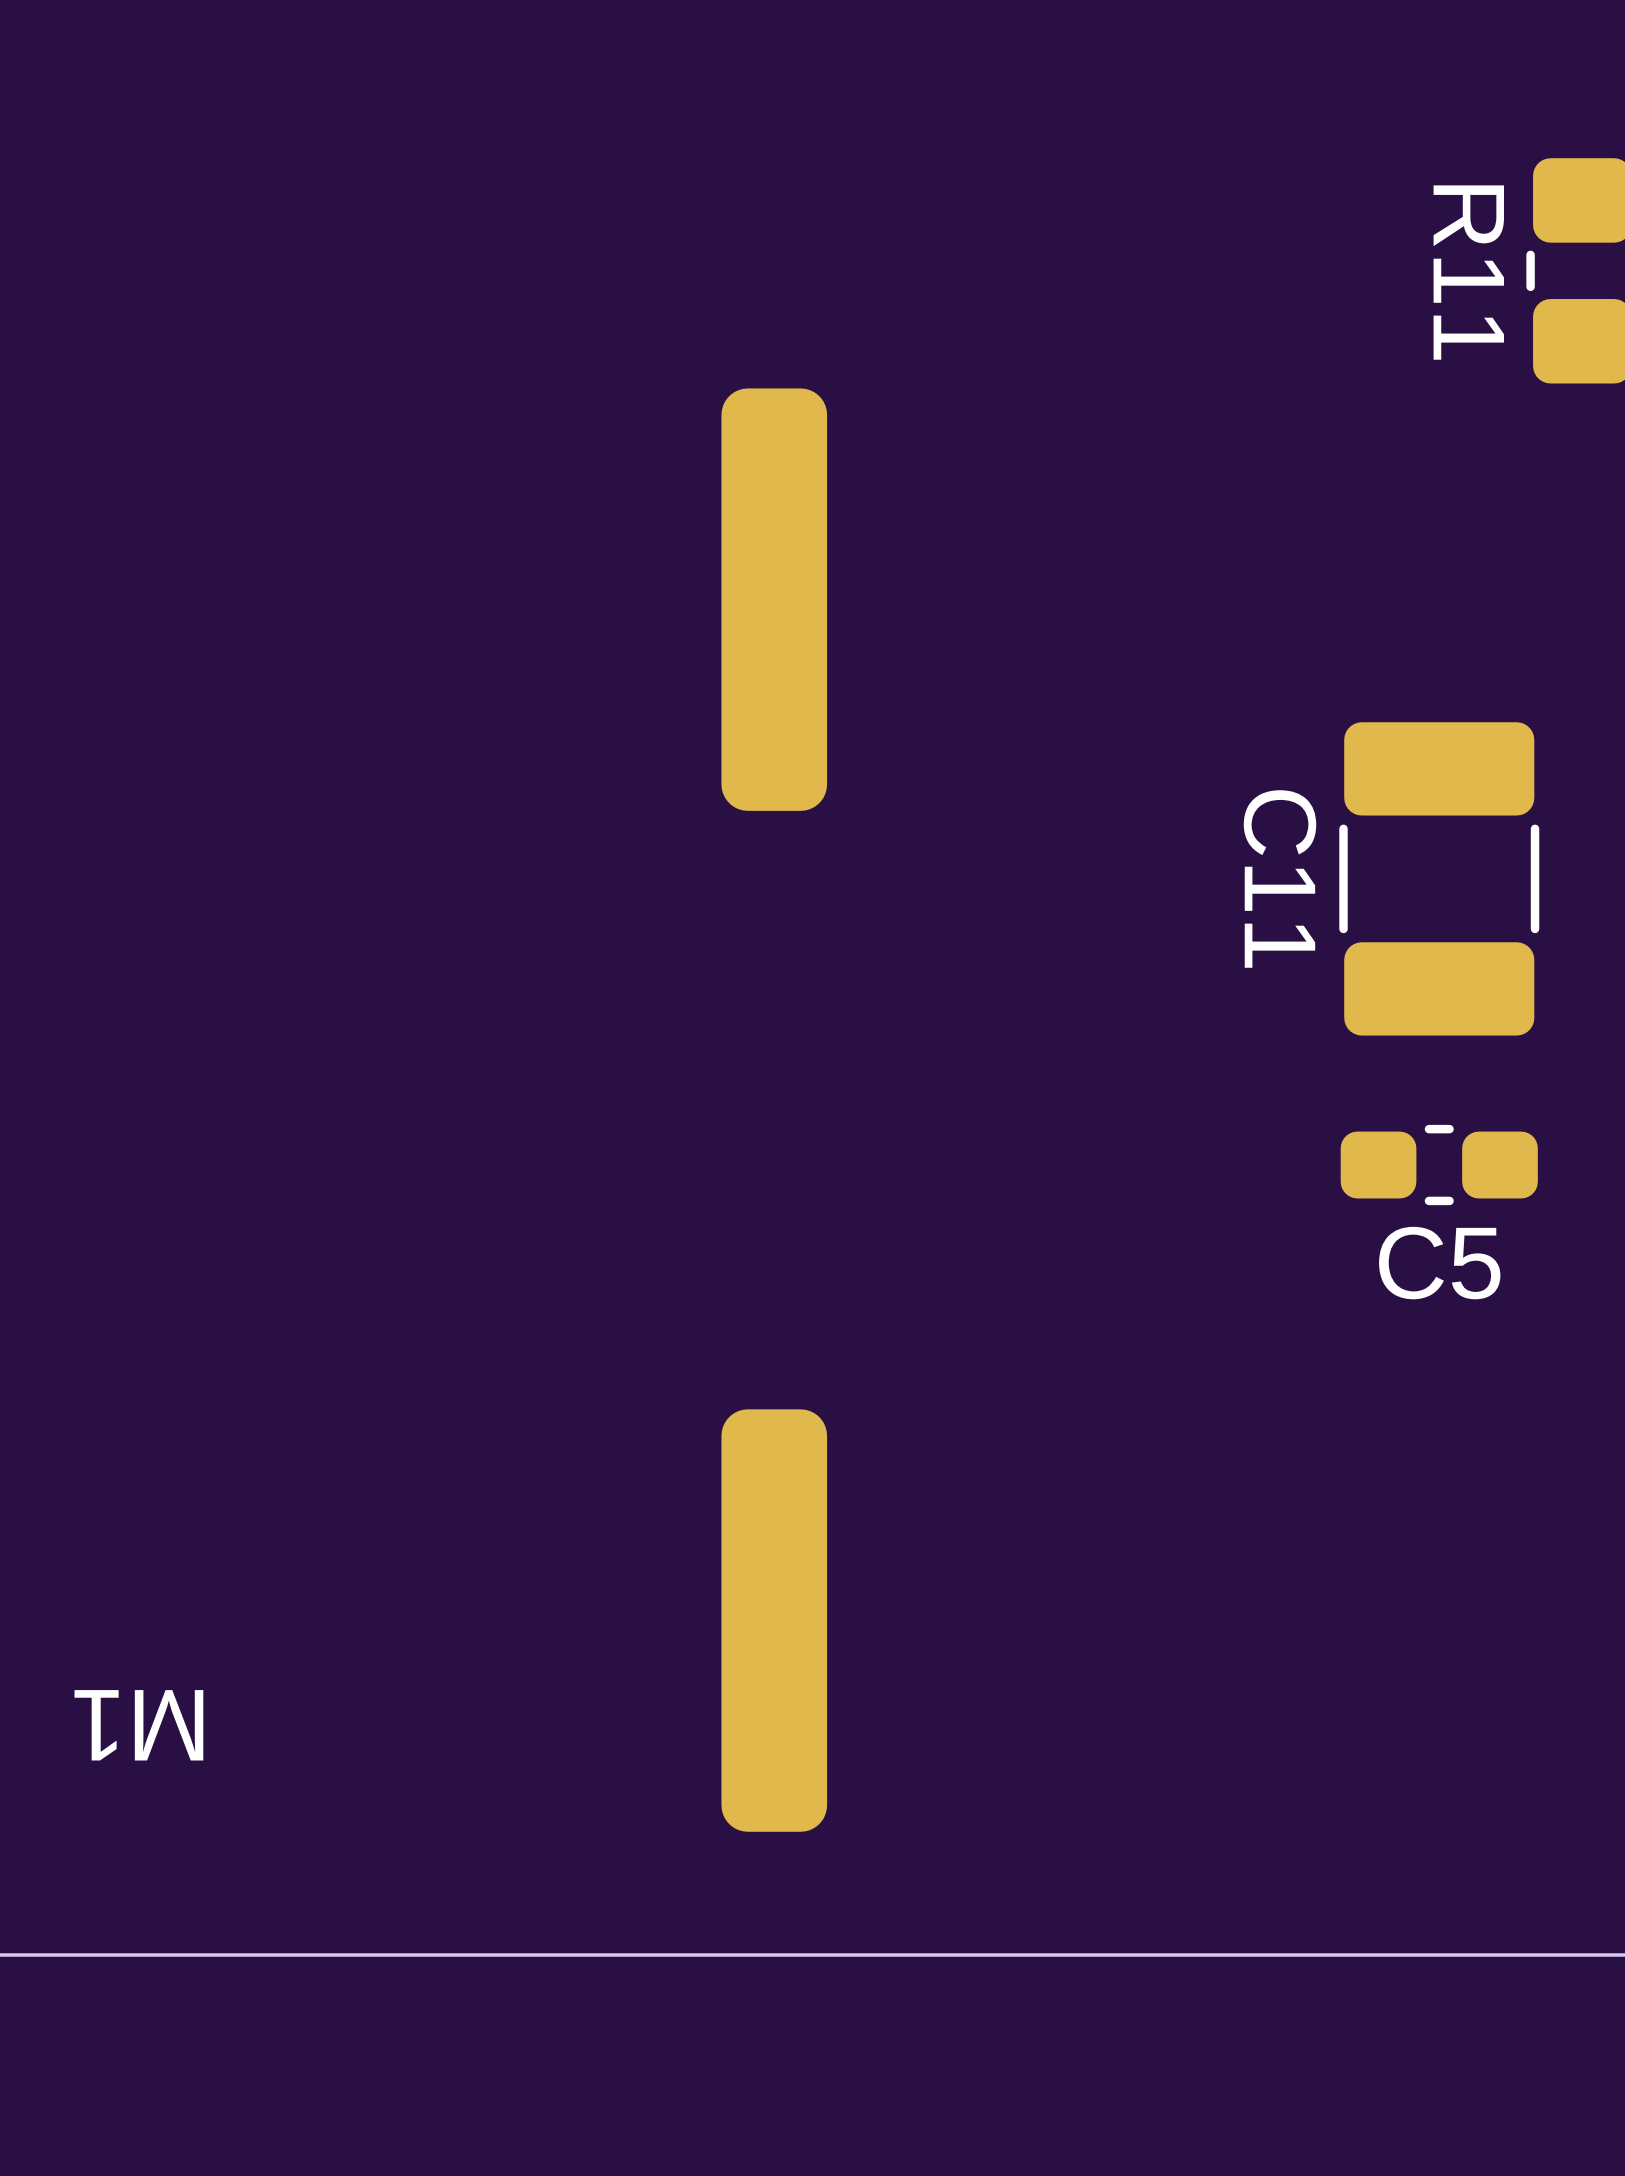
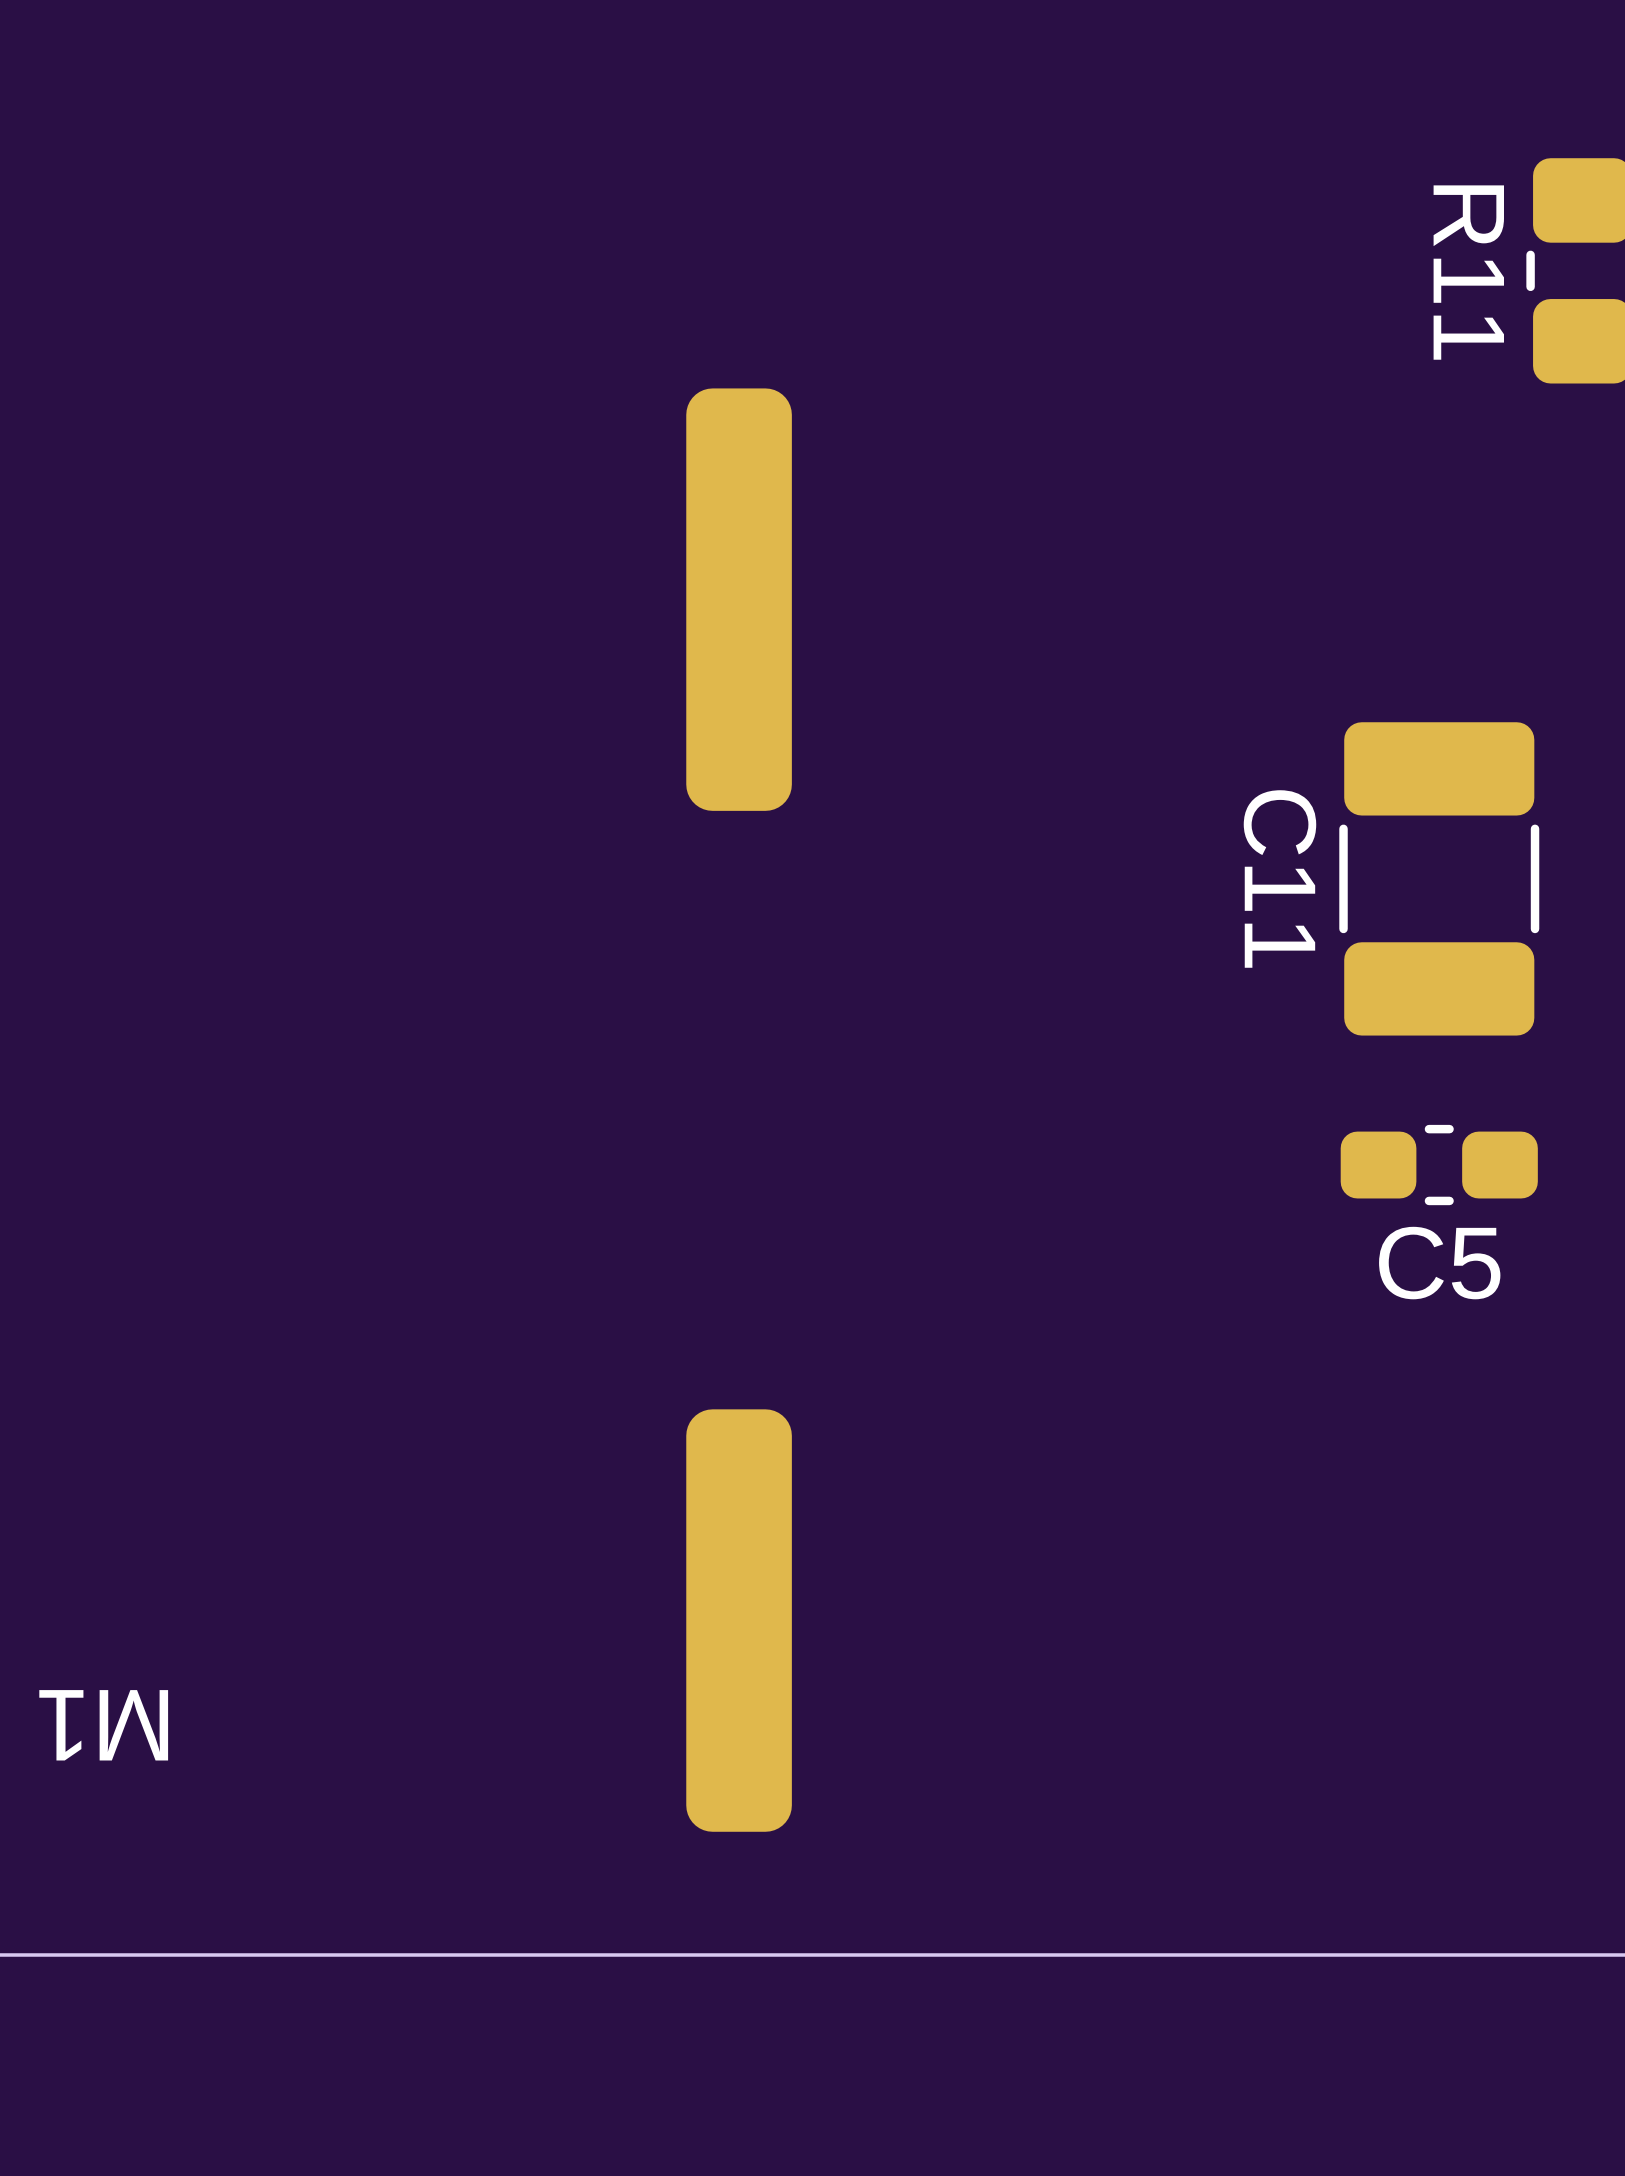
M1 position: (774, 1110) -> (739, 1110)

